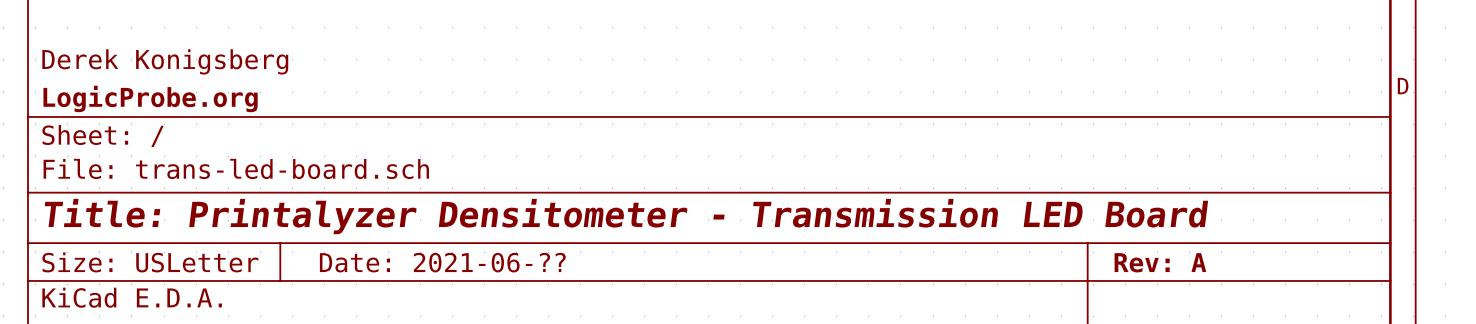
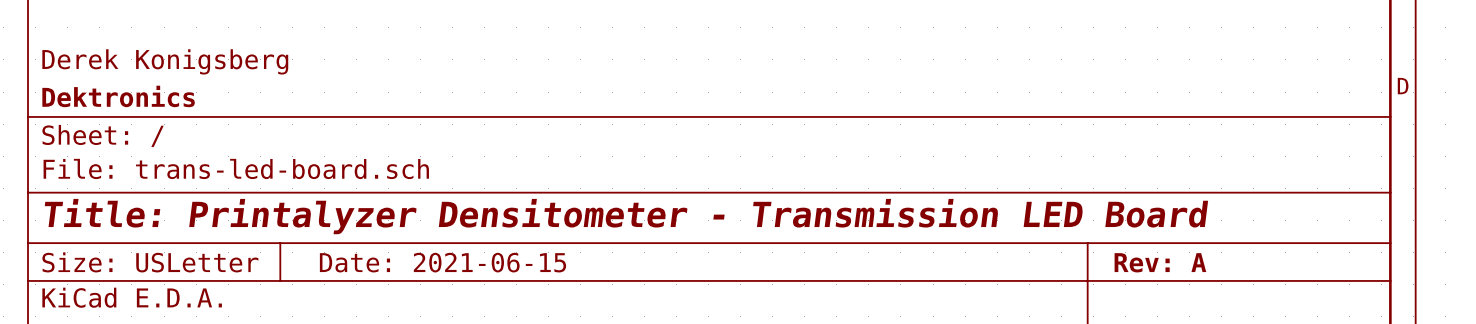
title block: LogicProbe.org (150, 98) -> Dektronics (118, 96)
title block: Date: 2021-06-?? (442, 262) -> Date: 2021-06-15 (442, 262)

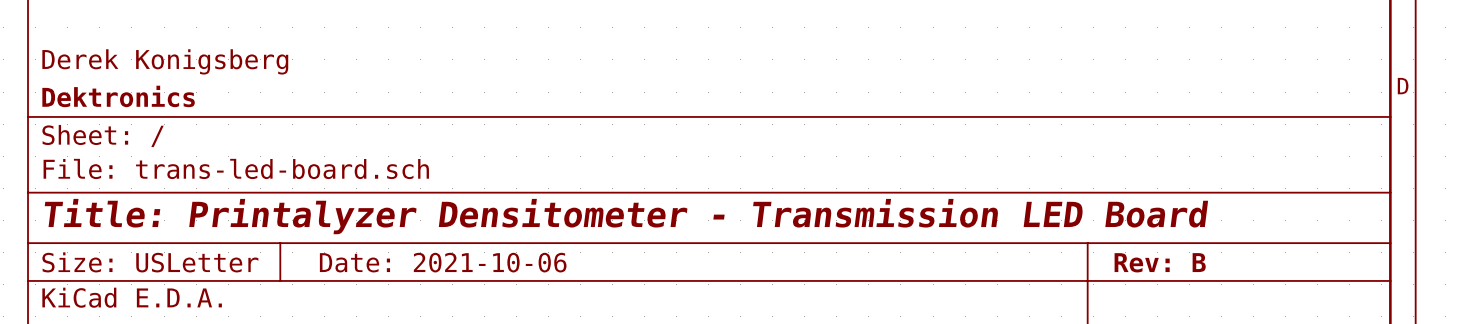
title block: Date: 2021-06-15 (442, 262) -> Date: 2021-10-06 (443, 262)
title block: Rev: A (1160, 262) -> Rev: B (1160, 262)

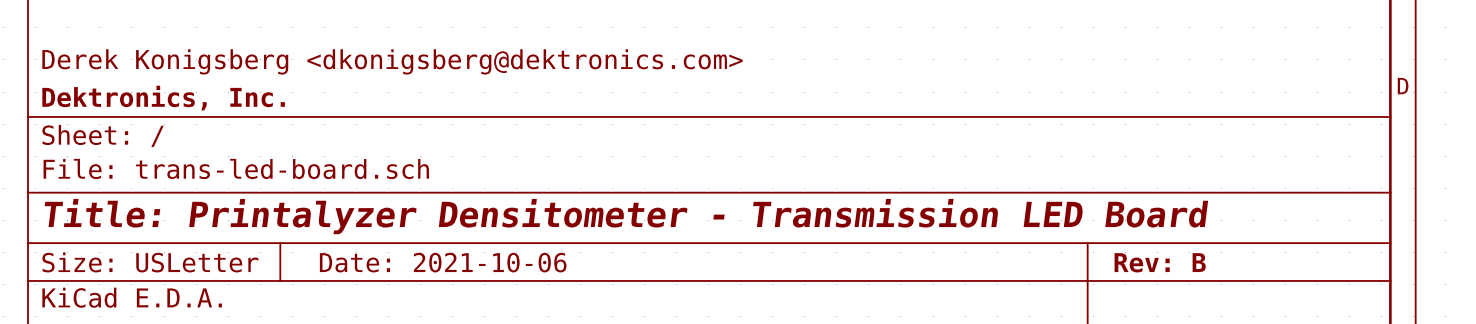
title block: Derek Konigsberg (165, 61) -> Derek Konigsberg <dkonigsberg@dektronics.com> (392, 61)
title block: Dektronics (118, 96) -> Dektronics, Inc. (163, 98)

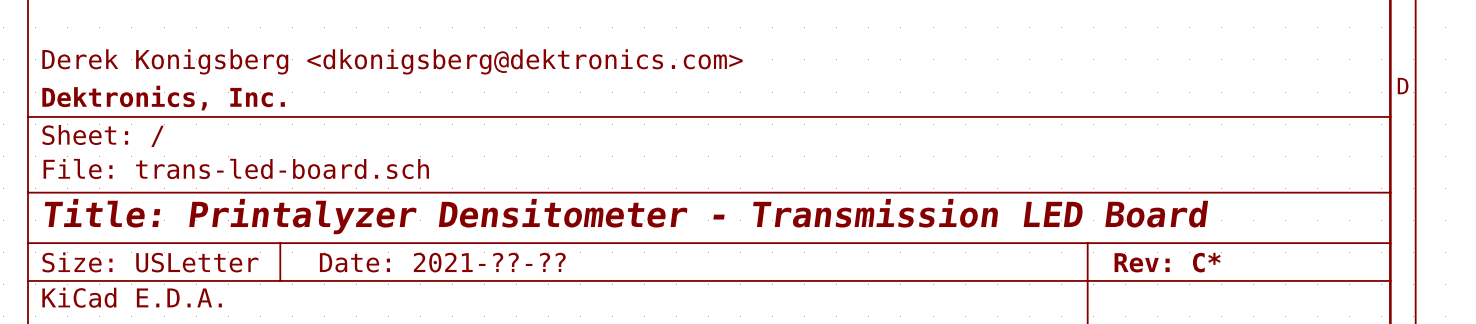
title block: Date: 2021-10-06 (443, 262) -> Date: 2021-??-?? (442, 262)
title block: Rev: B (1160, 262) -> Rev: C* (1167, 262)

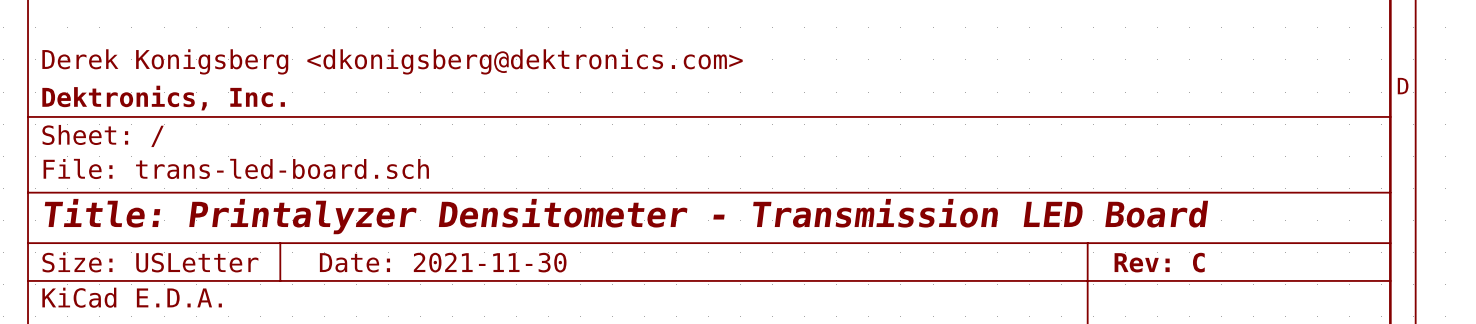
title block: Date: 2021-??-?? (442, 262) -> Date: 2021-11-30 (443, 262)
title block: Rev: C* (1167, 262) -> Rev: C (1159, 262)

